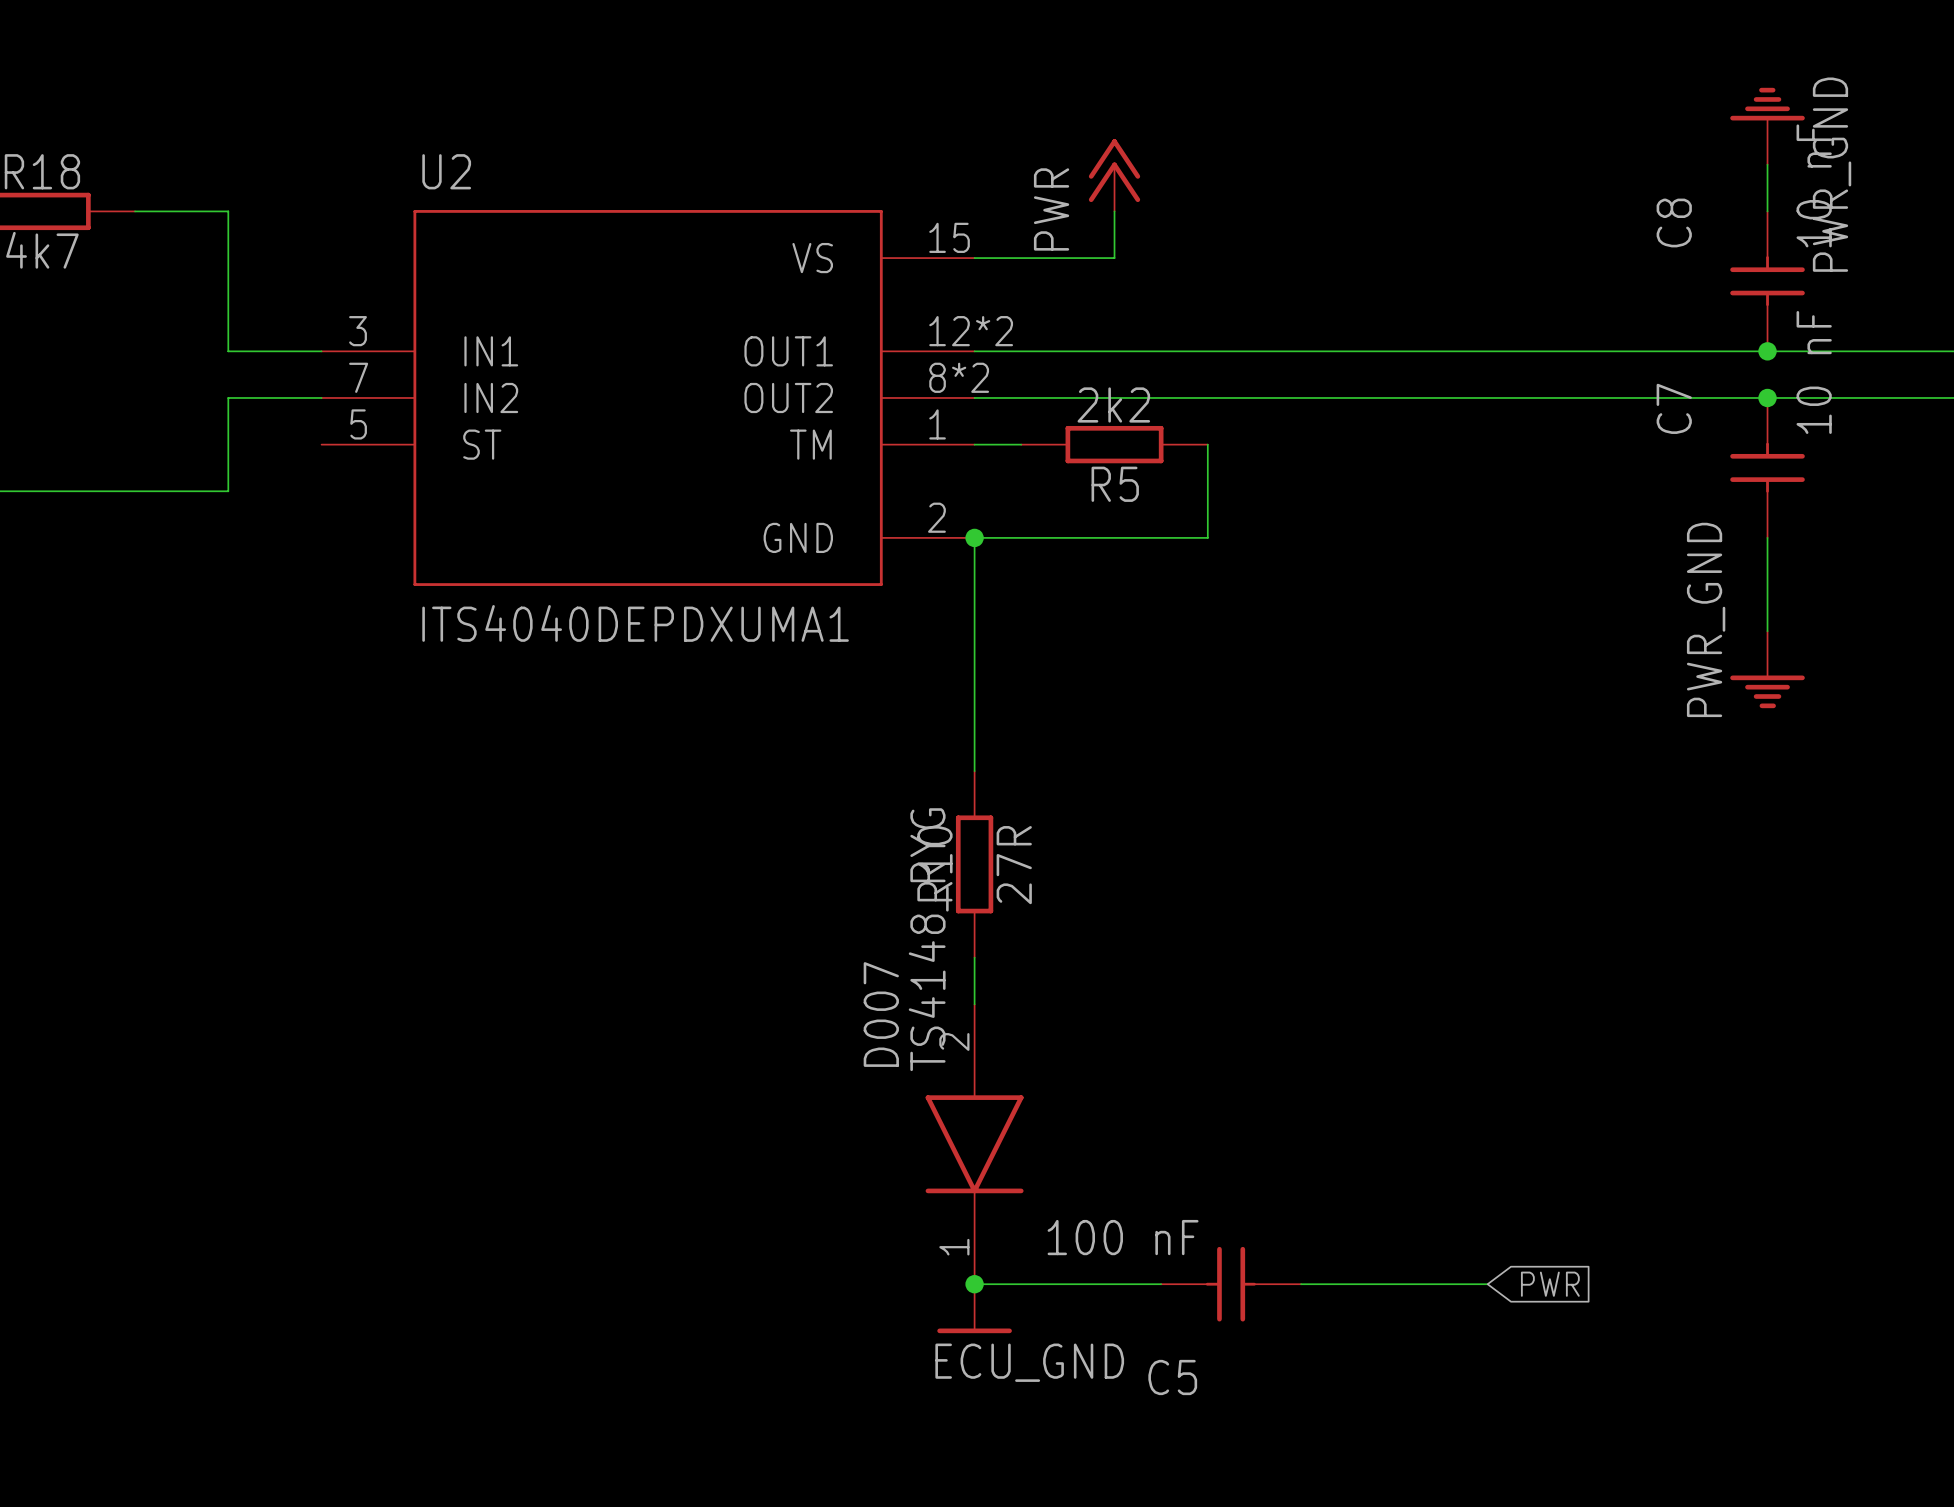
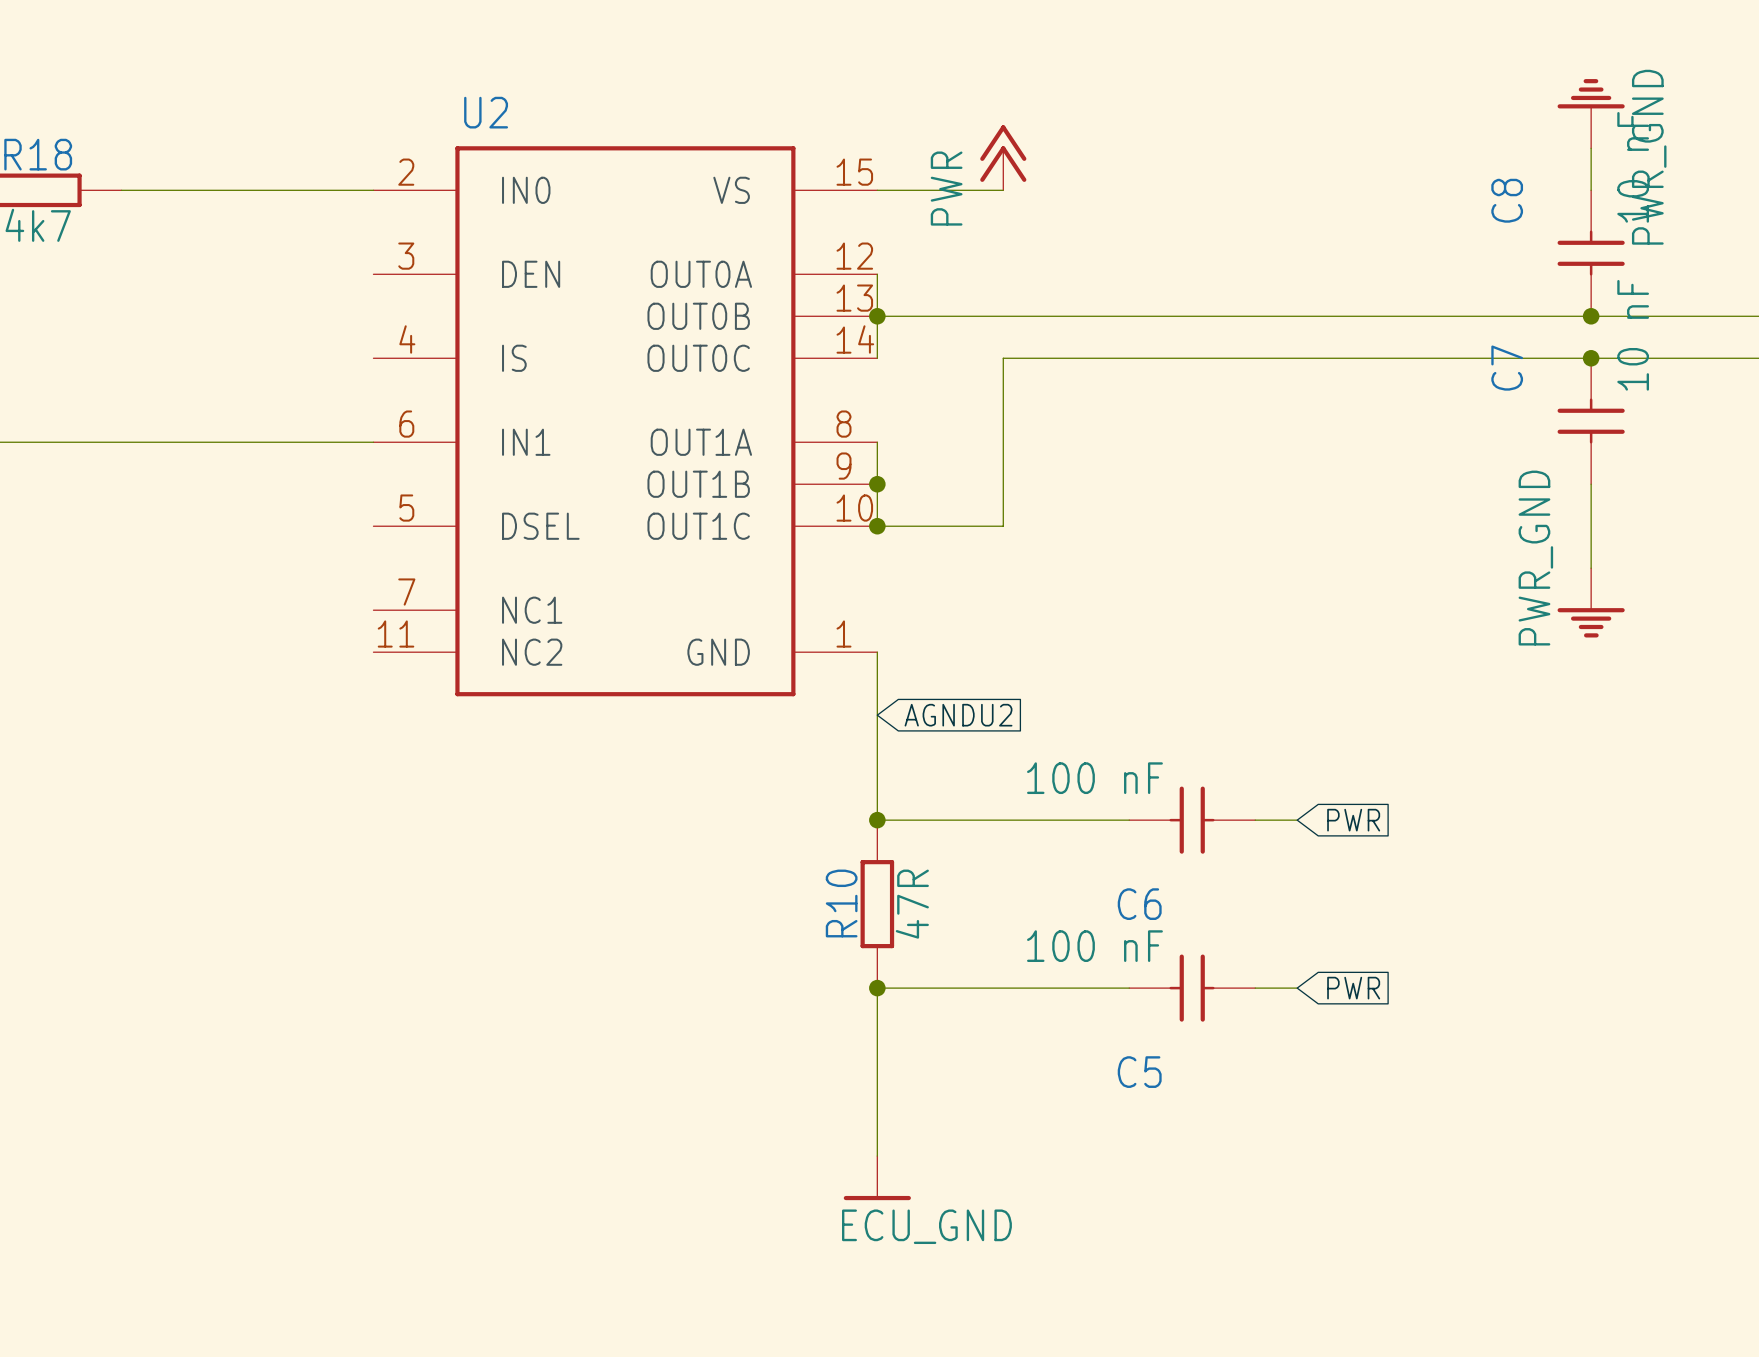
U2 name position: U2 (446, 171) -> U2 (486, 112)
U2 symbol: [321, 210, 975, 586] -> [373, 146, 878, 697]
wire: (228, 211) (228, 351) (321, 351) -> (205, 190) (373, 190)
wire: (1114, 211) (1114, 258) (974, 258) -> (1003, 190) (877, 190)
junction: none -> (877, 316)
wire: (321, 397) (228, 397) (228, 491) -> (373, 442) (205, 442)
wire: (974, 397) (1114, 397) -> (877, 358) (877, 274)
wire: (974, 444) (1021, 444) -> none
R5: 2k2 (1114, 444) -> none
wire: (1207, 444) (1207, 537) (974, 537) -> (877, 442) (877, 484)
wire: (974, 584) (974, 724) -> (877, 526) (1003, 526) (1003, 358)
junction: none -> (877, 526)
U2 value: ITS4040DEPDXUMA1 (635, 623) -> none
wire: none -> (877, 694) (877, 820) (1129, 820)
global label: none -> AGNDU2 (958, 715)
R10 position: (974, 864) -> (877, 904)
R10 value: 27R (1014, 865) -> 47R (912, 904)
junction: none -> (877, 820)
C6: none -> 100 nF (1192, 820)
wire: none -> (1255, 820) (1297, 820)
global label: none -> PWR (1353, 820)
wire: (974, 957) (974, 1004) -> none
junction: none -> (877, 988)
wire: none -> (1255, 988) (1297, 988)
global label: none -> PWR (1353, 988)
D007: TS4148_RYG (974, 1144) -> none
wire: (974, 1284) (1161, 1284) -> (877, 1156) (877, 988) (1129, 988)
junction: (974, 1284) -> none
C5 position: (1231, 1284) -> (1192, 988)
wire: (1301, 1284) (1487, 1284) -> none
global label: PWR (1550, 1284) -> none

